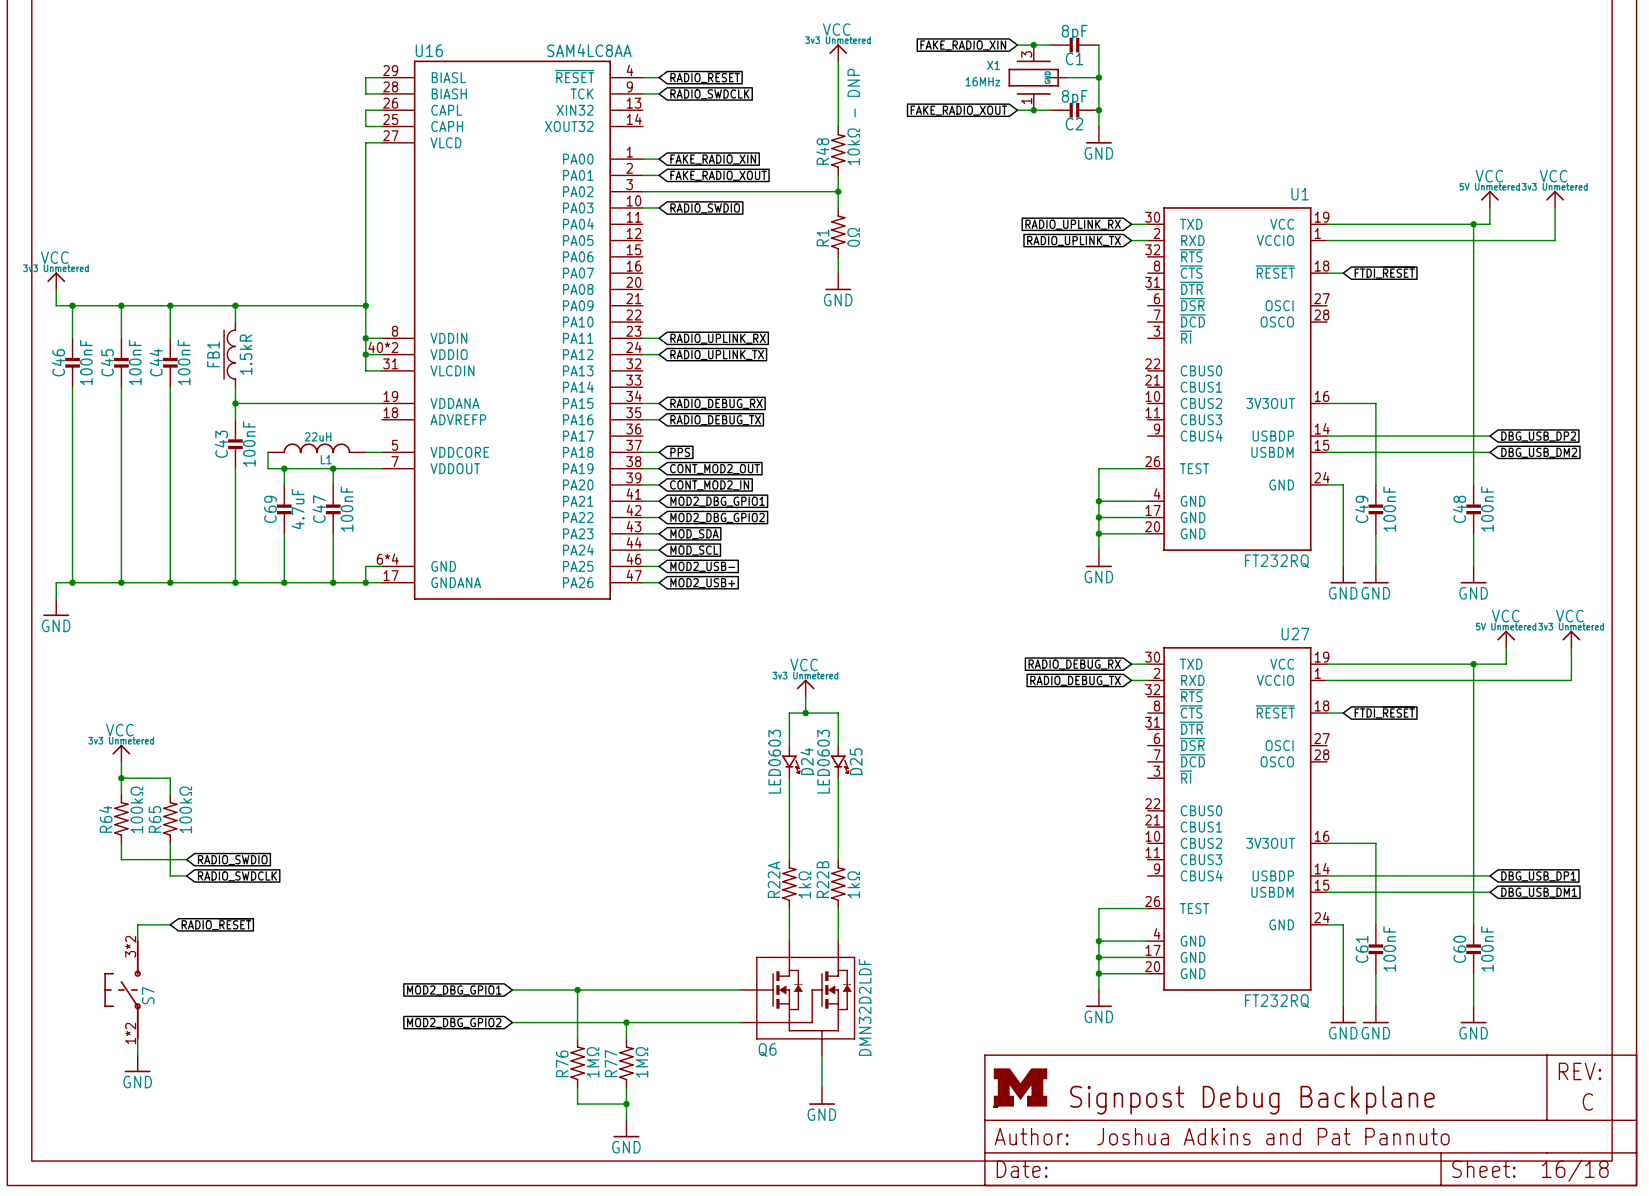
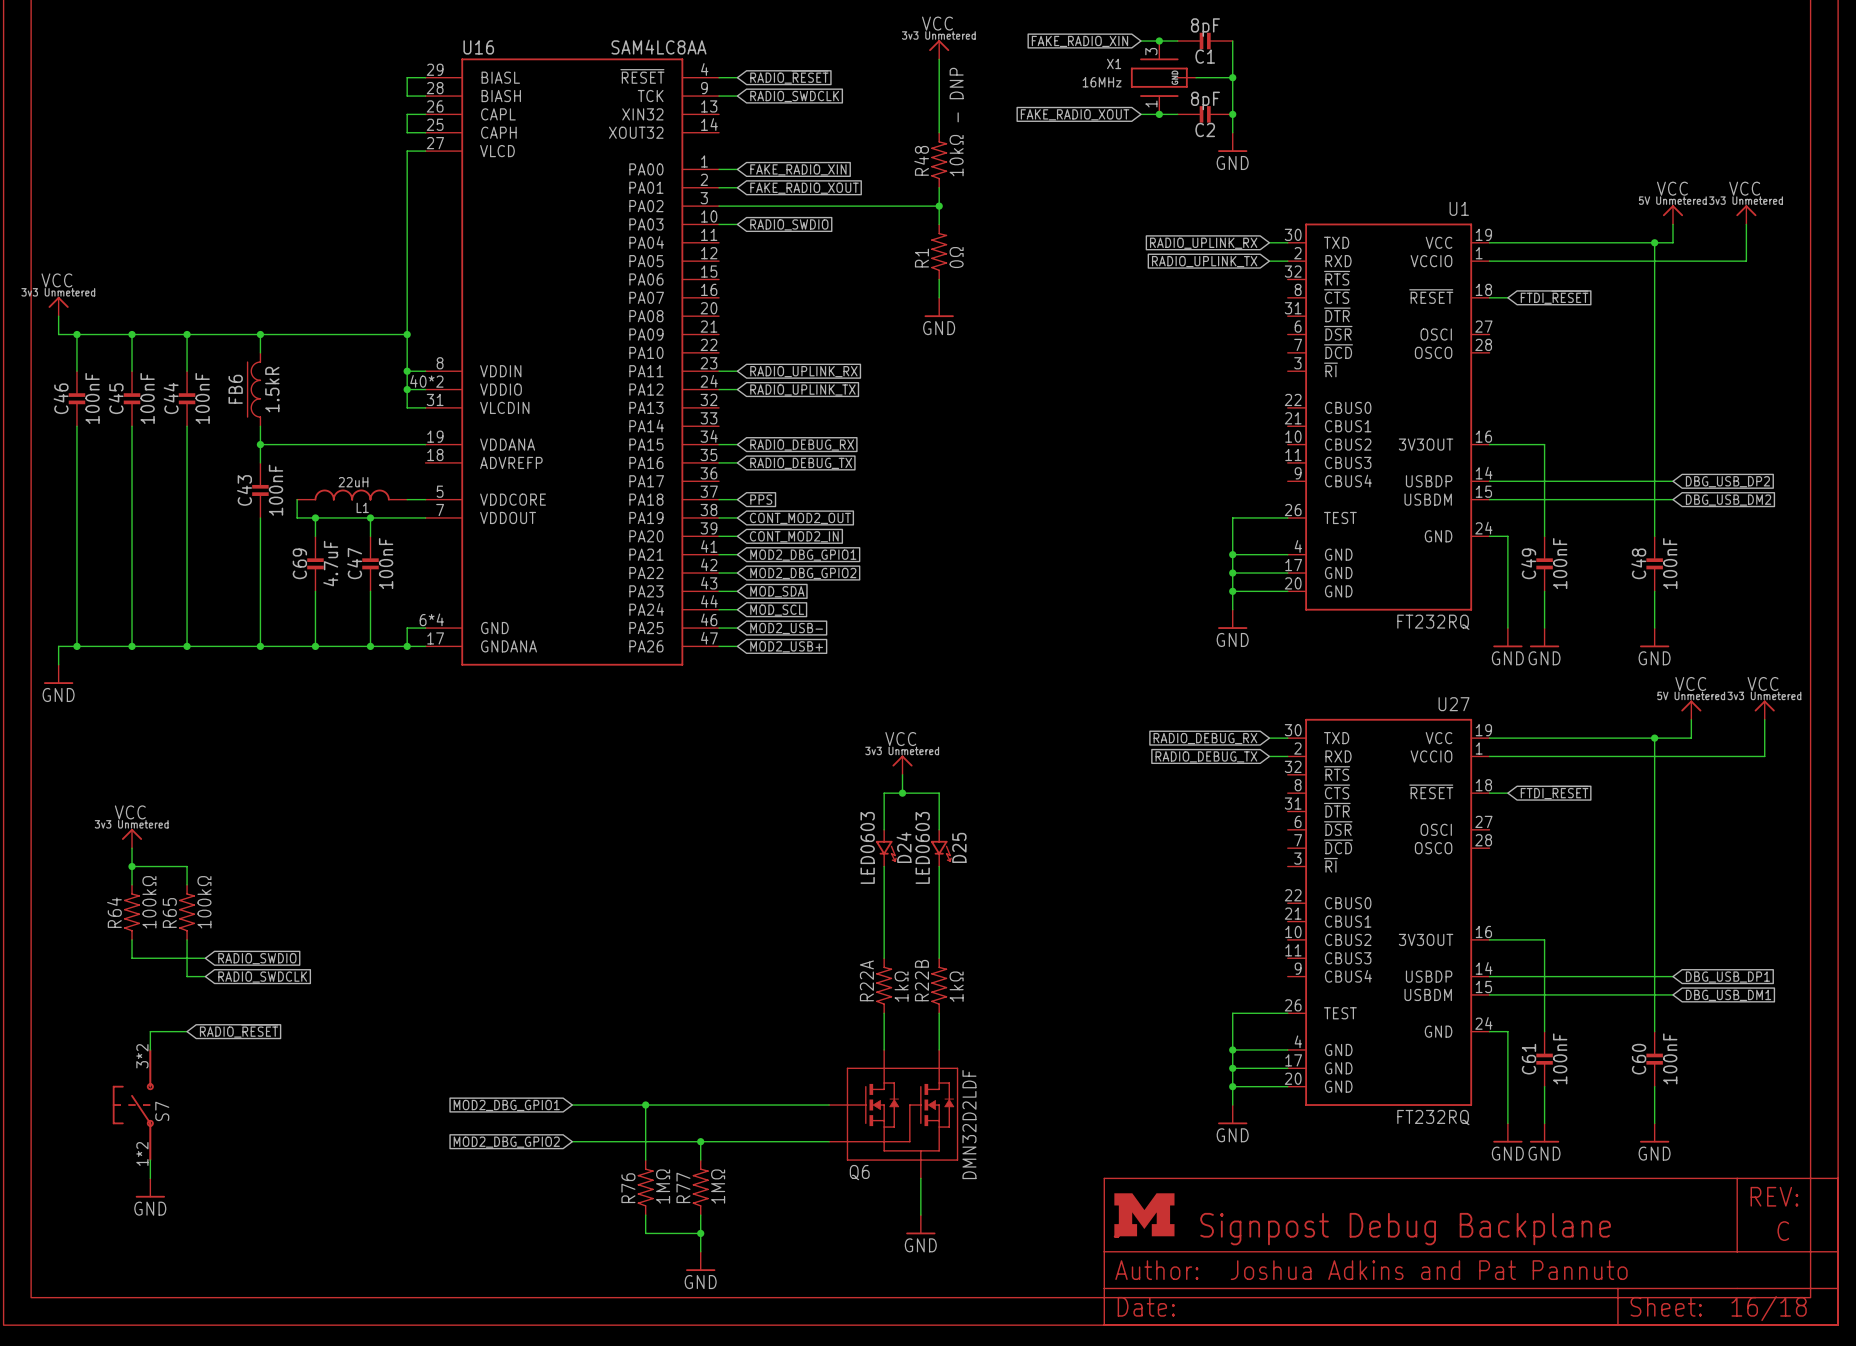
FB1 name: FB1 (213, 354) -> FB6 (235, 389)

